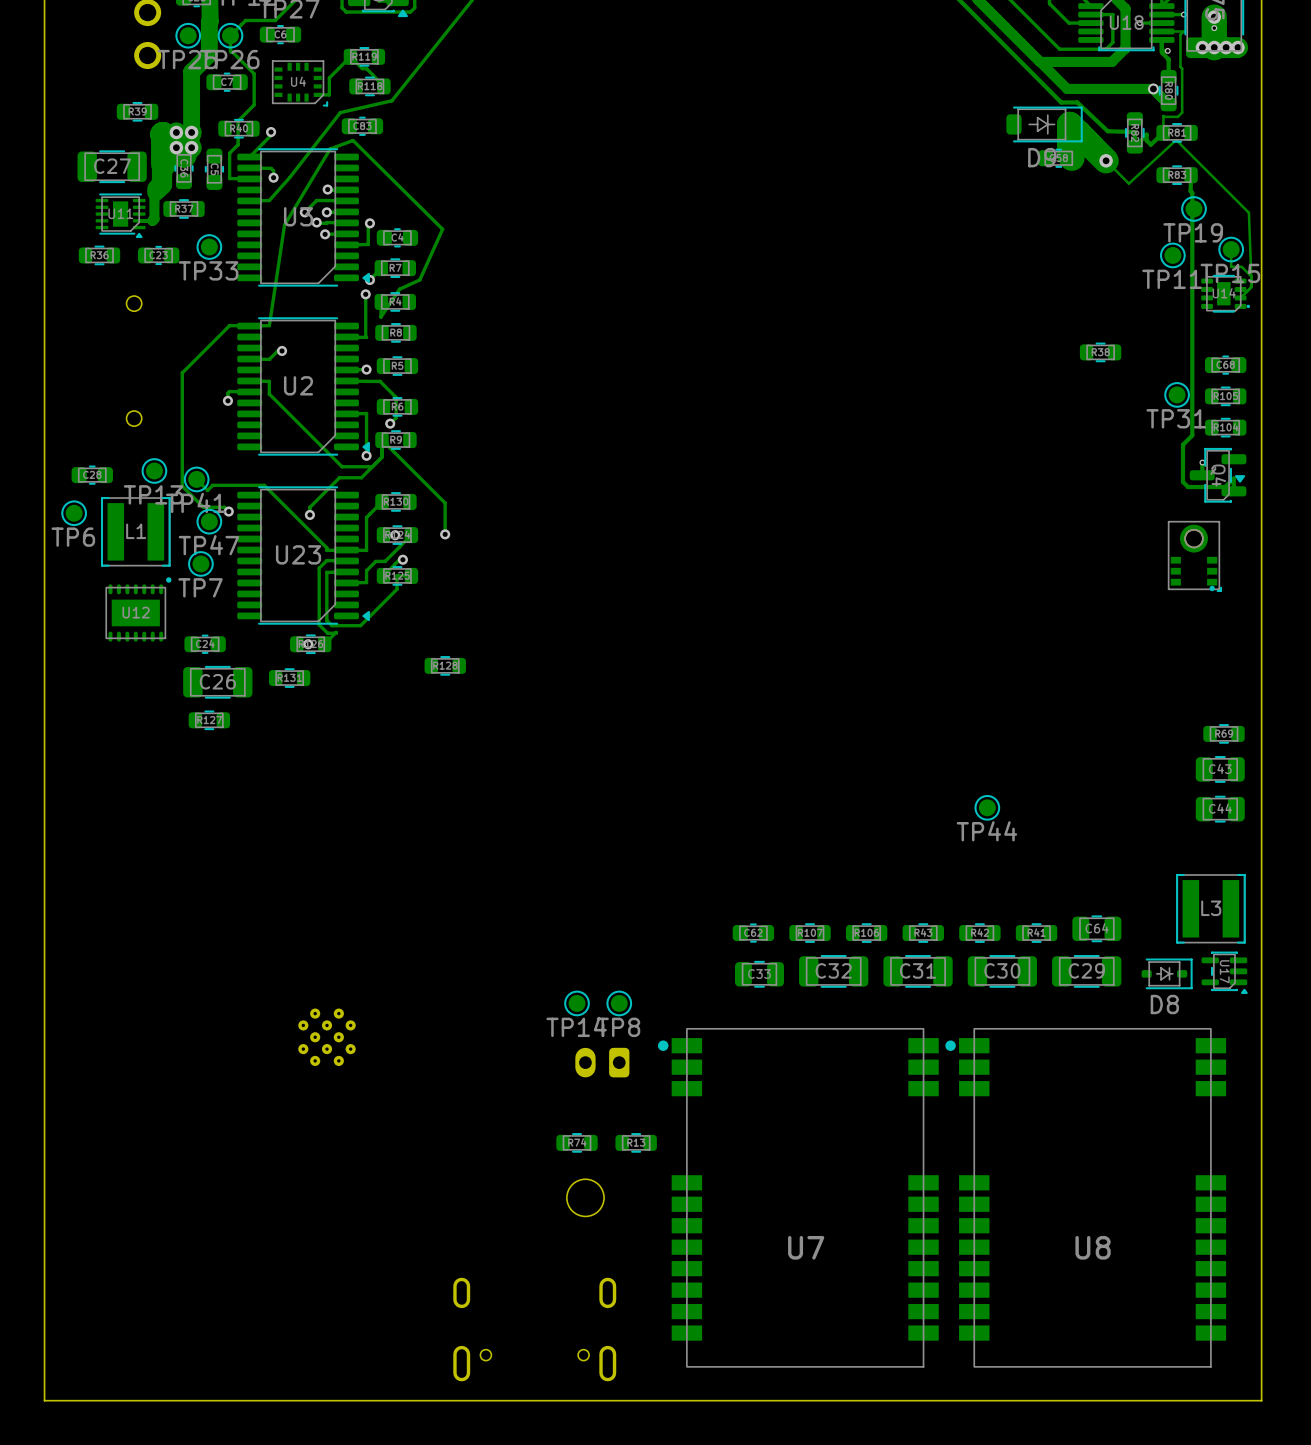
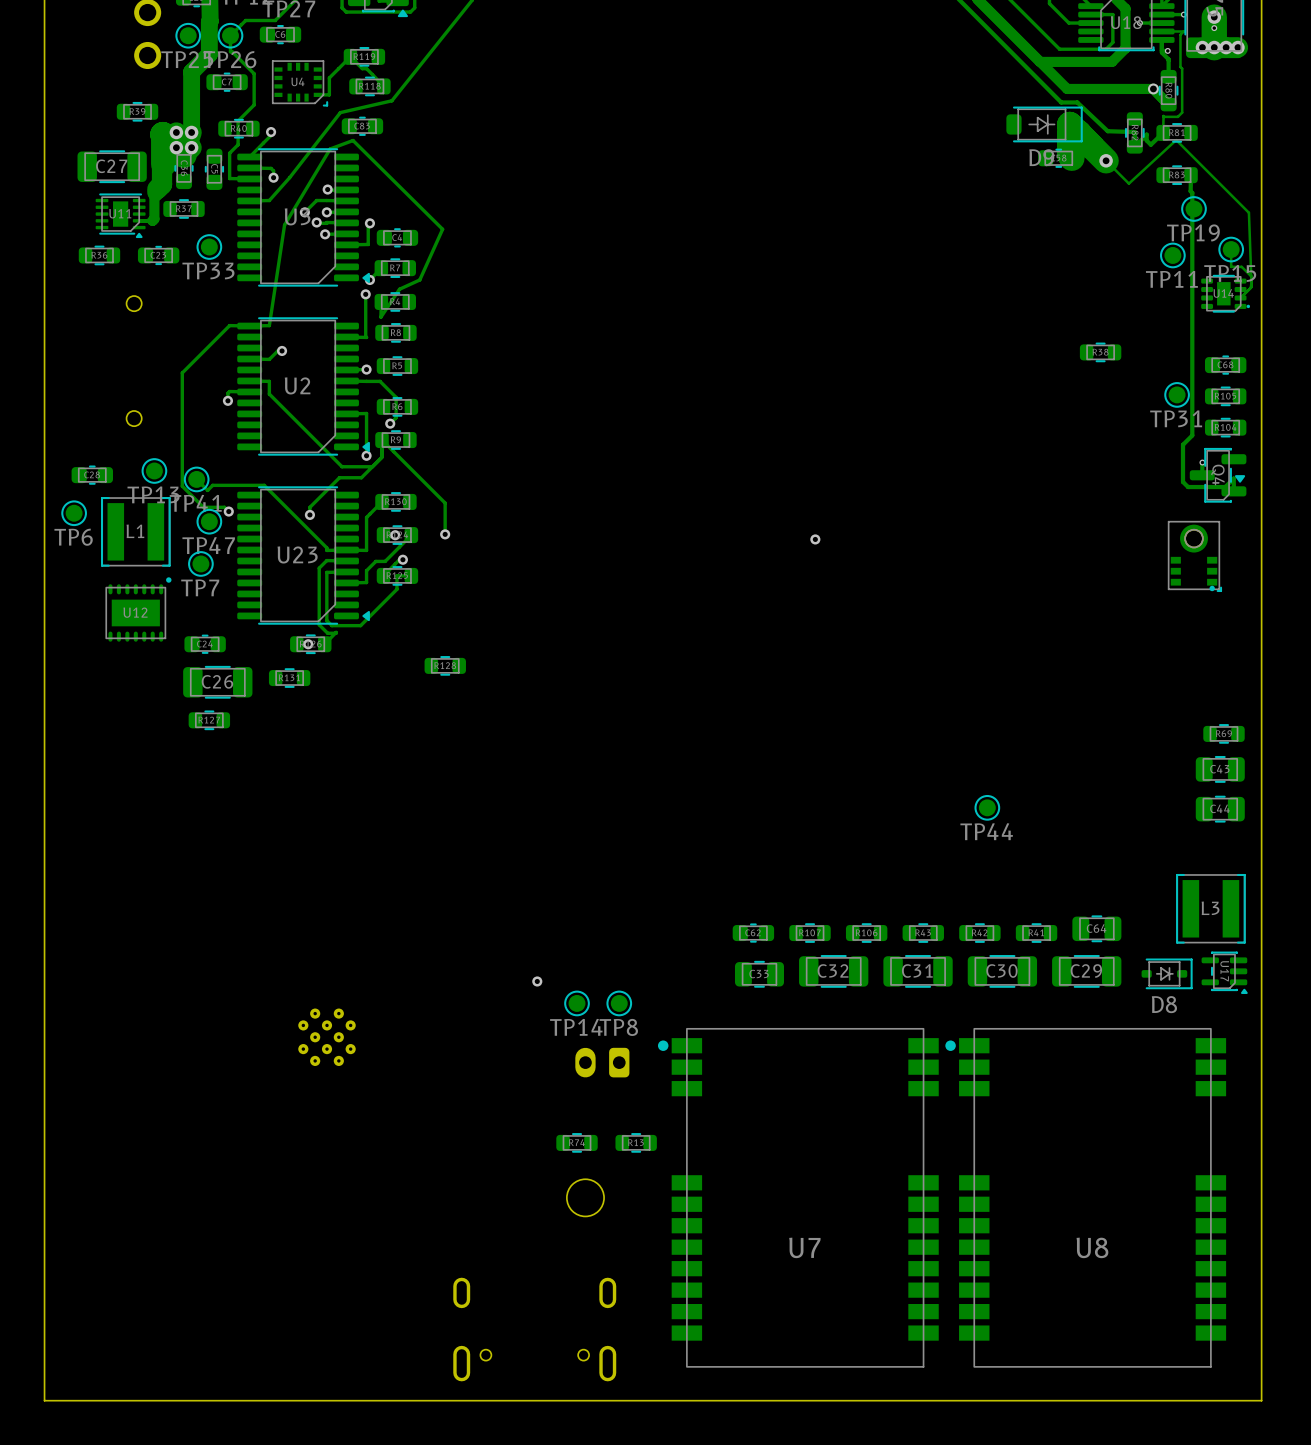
via: none -> (815, 539)
via: none -> (537, 981)

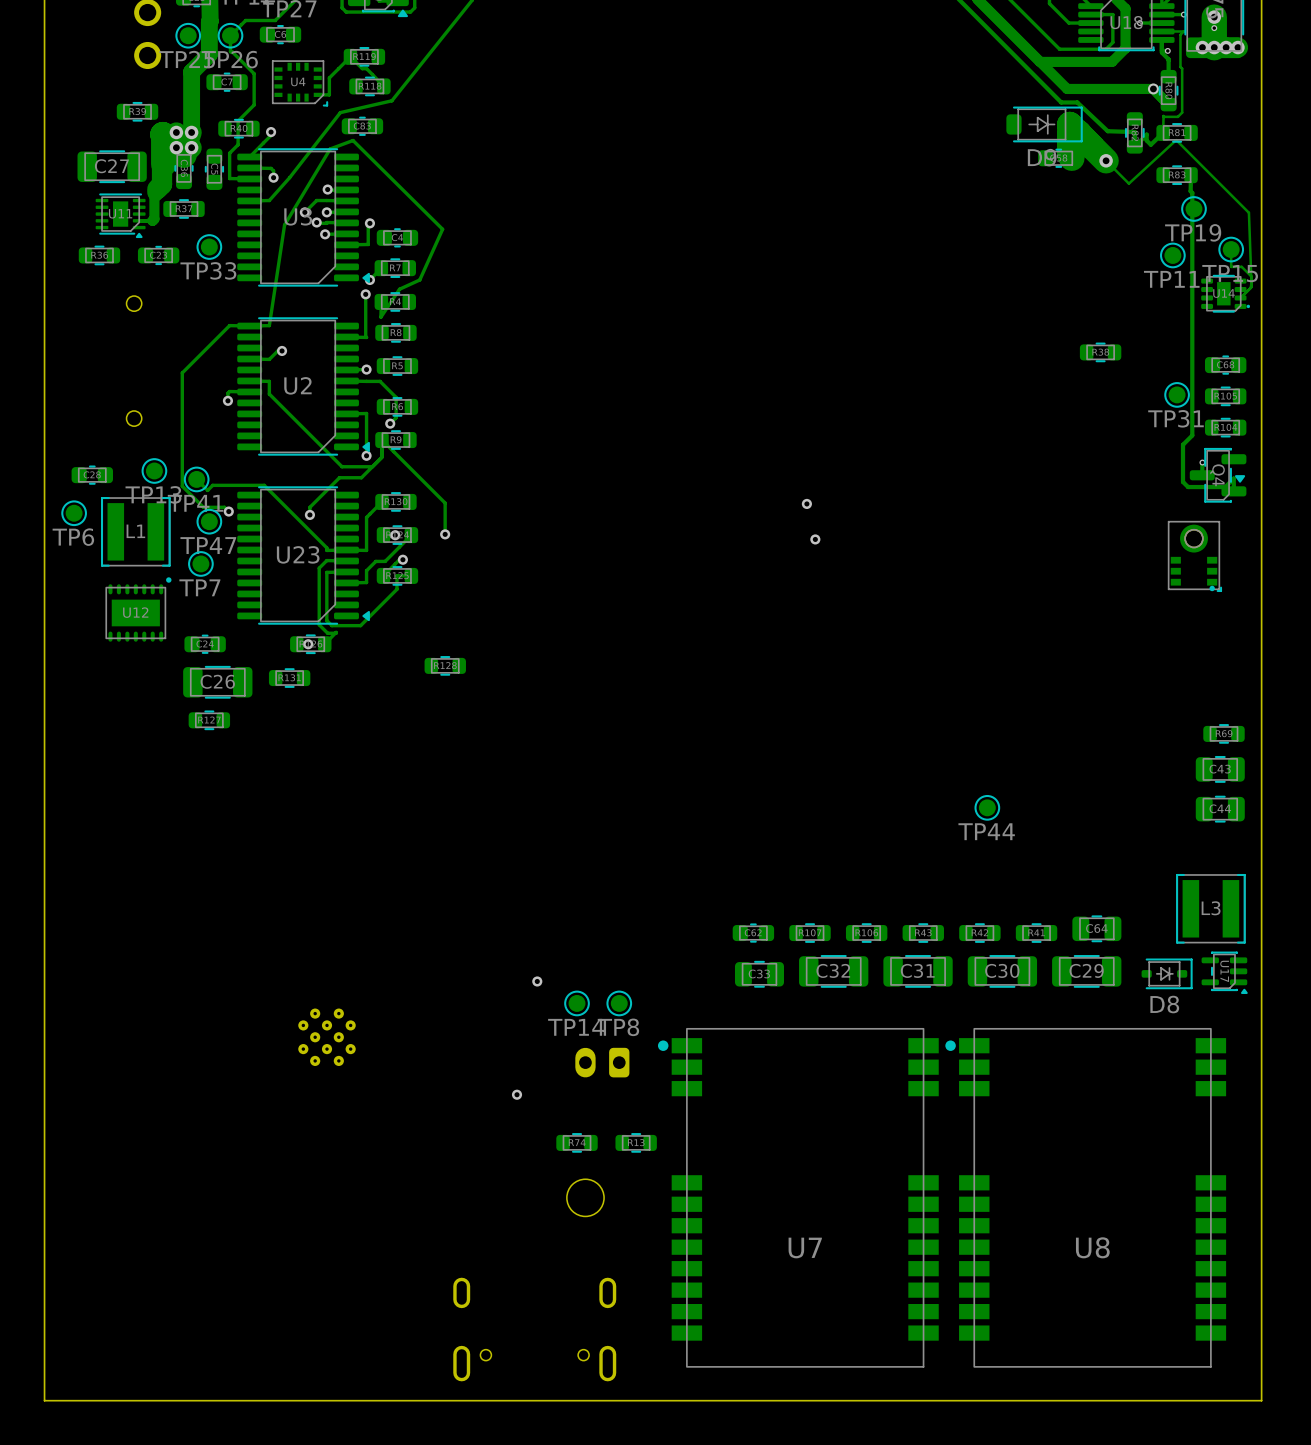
via: none -> (806, 503)
via: none -> (517, 1094)

